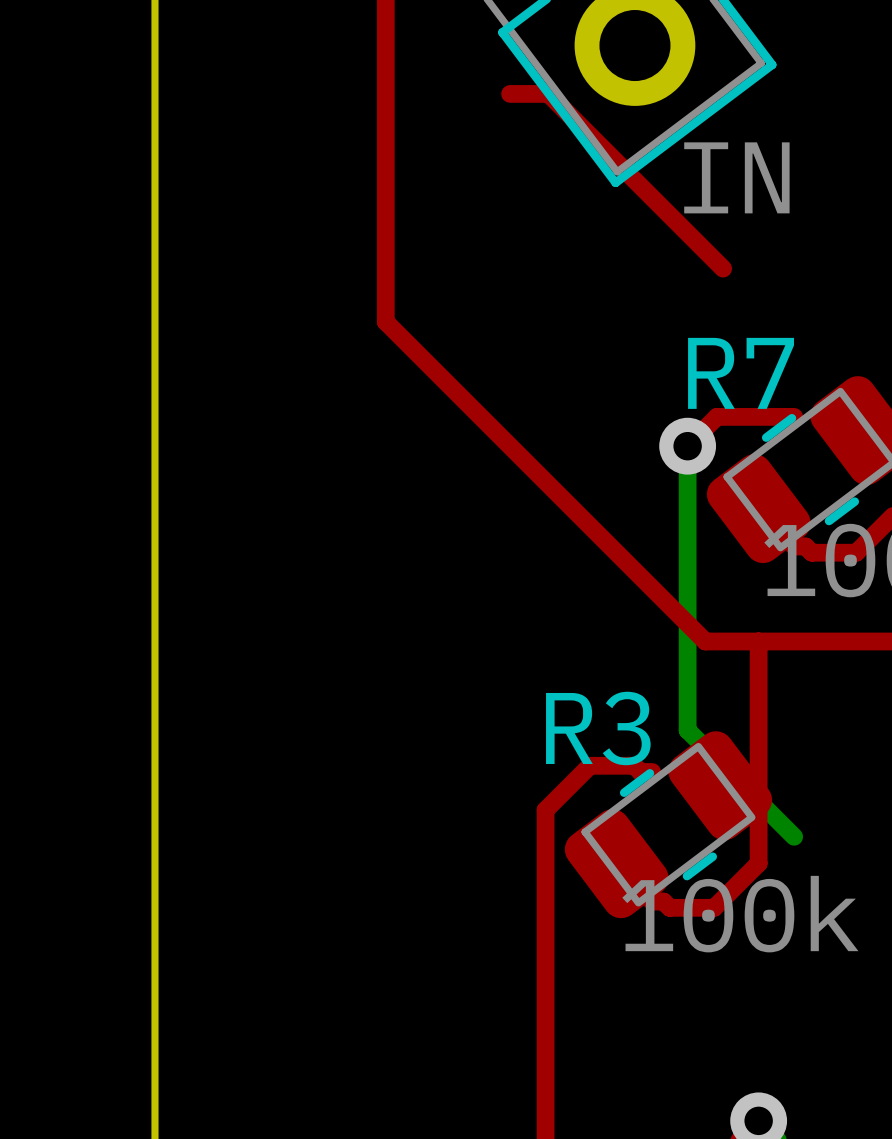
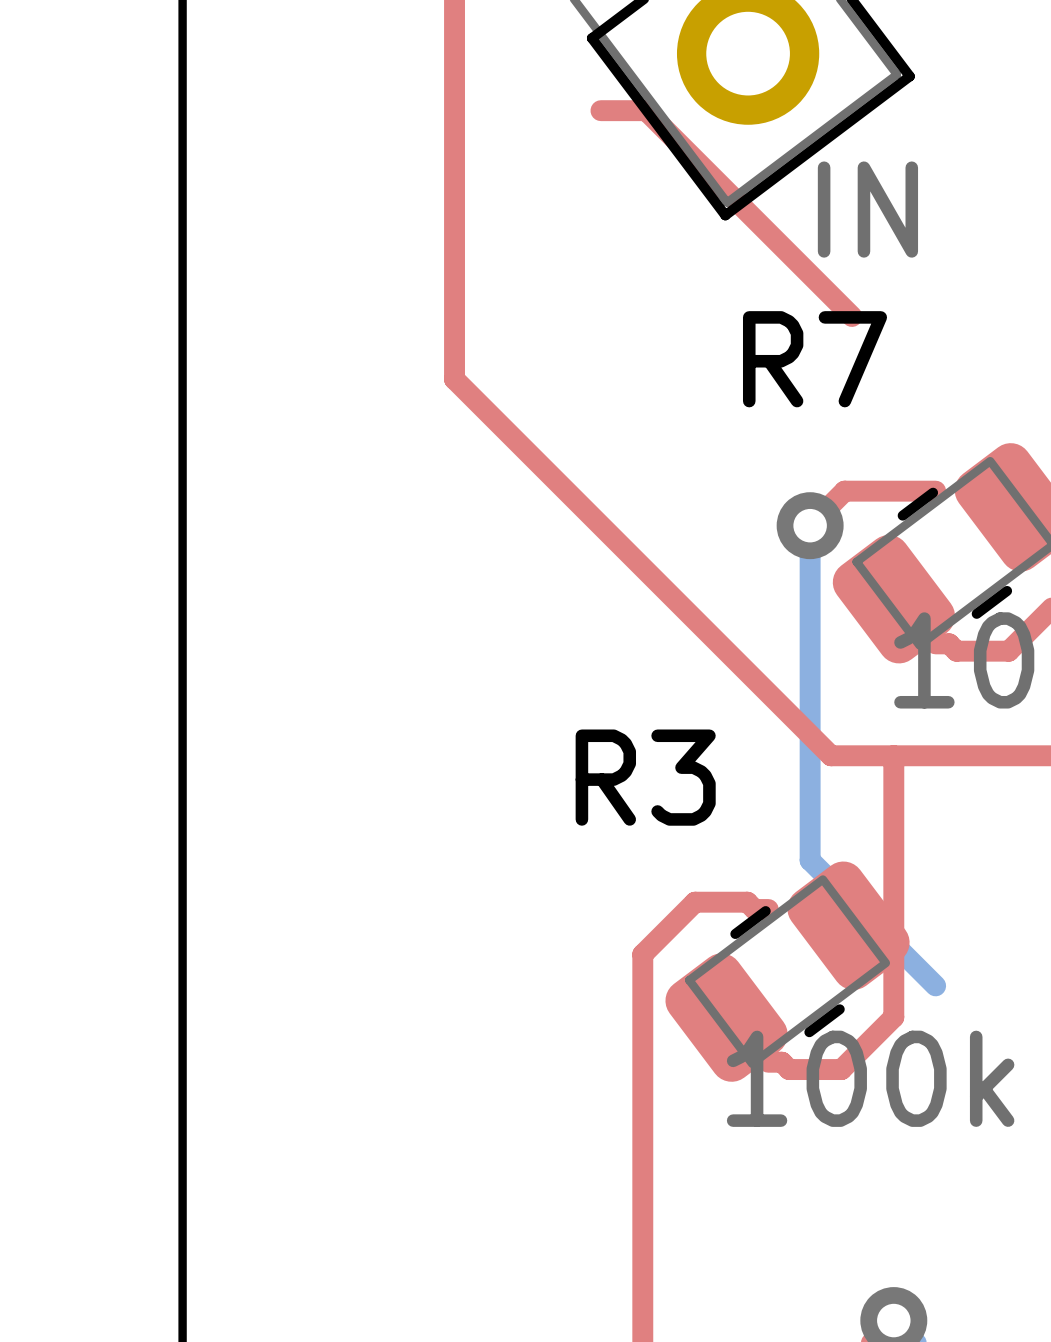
R7 name position: R7 (741, 373) -> R7 (815, 359)
R3 name position: R3 (598, 728) -> R3 (645, 777)

